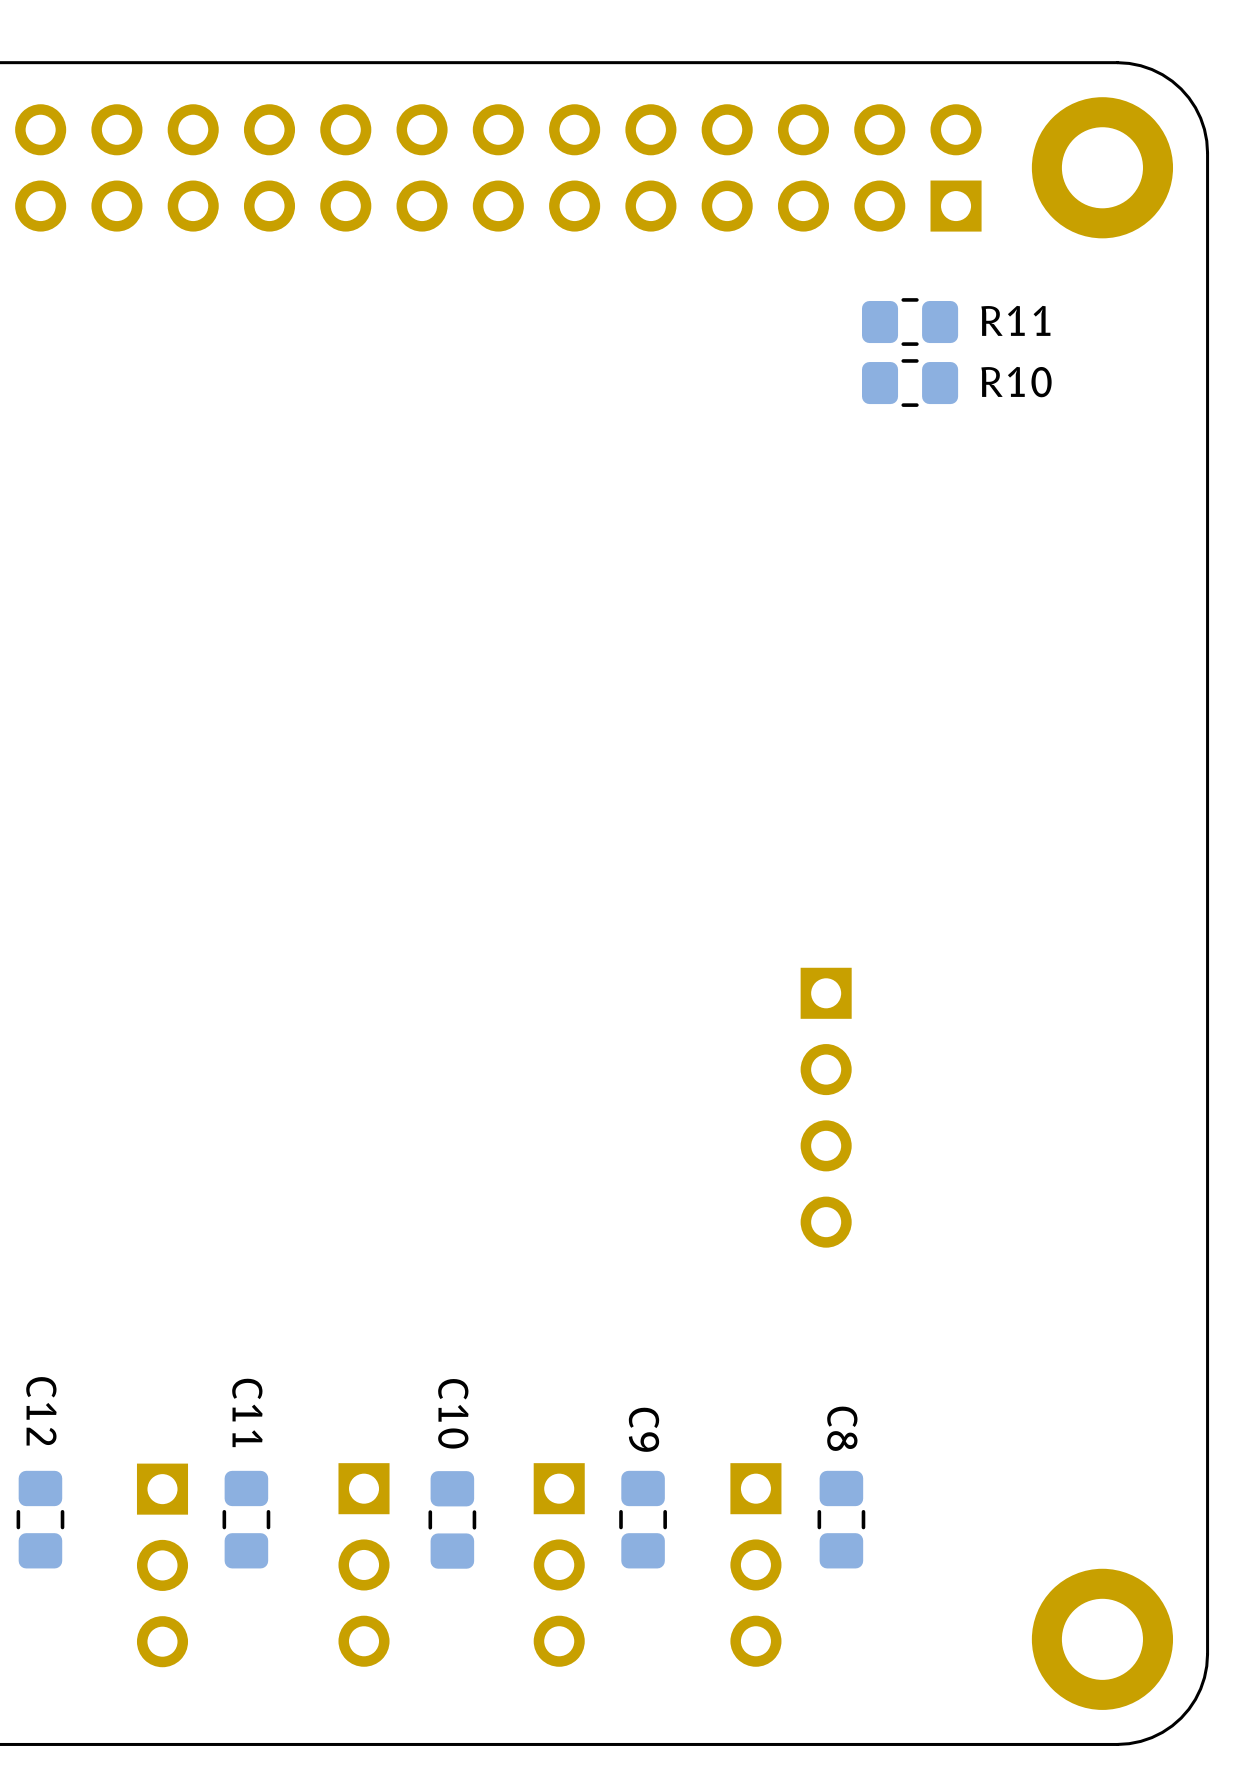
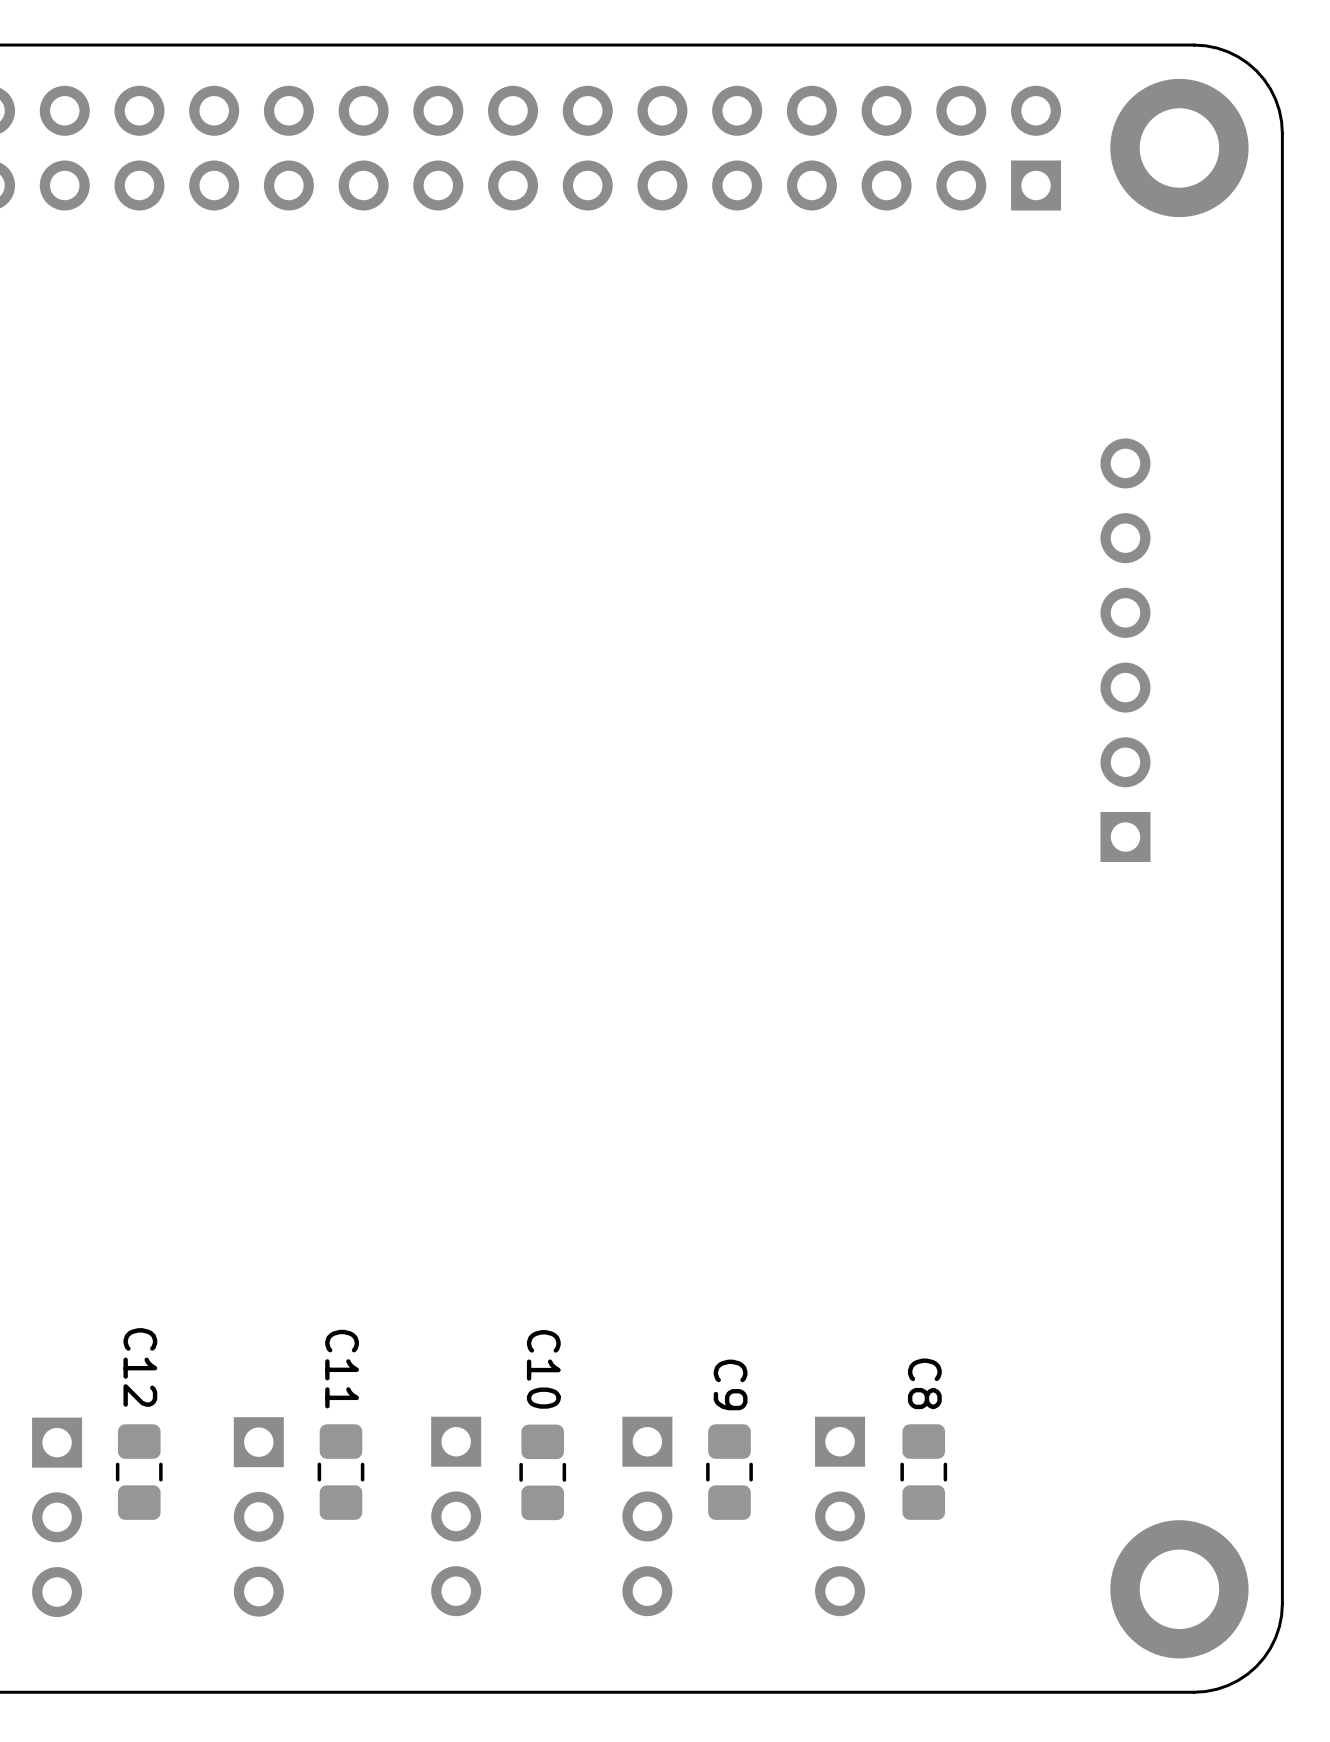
R11: (910, 322) -> none
R10: (910, 383) -> none
part: none -> (1125, 650)
part: (826, 1107) -> none

